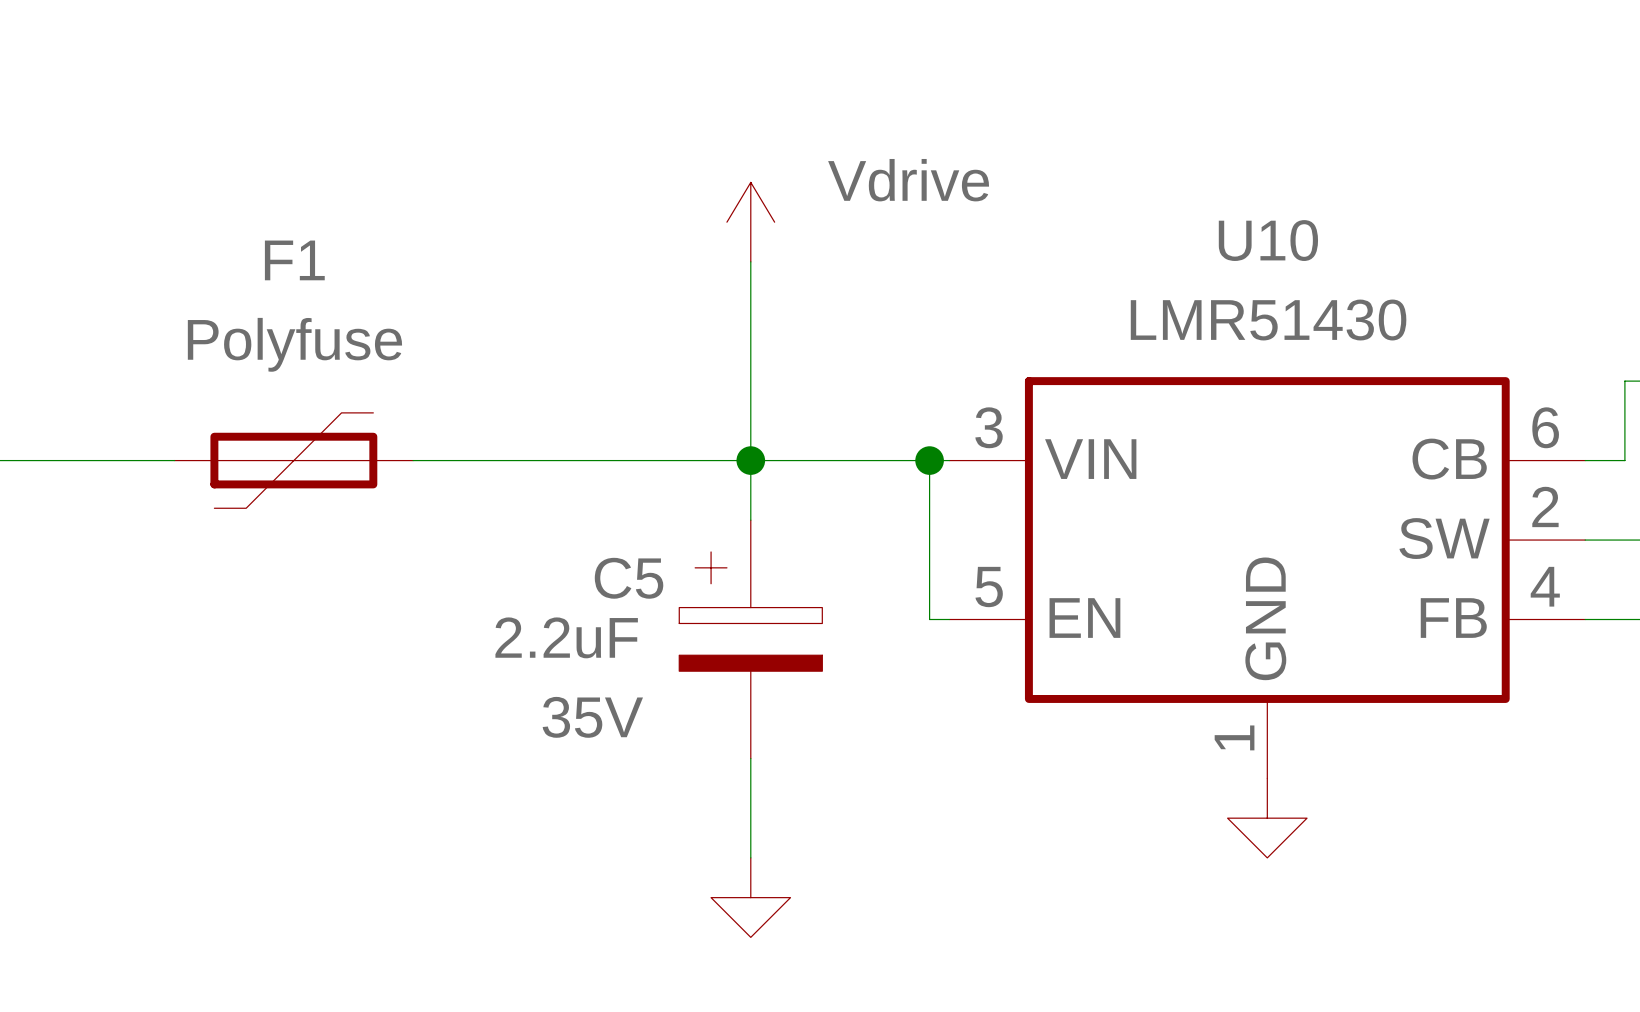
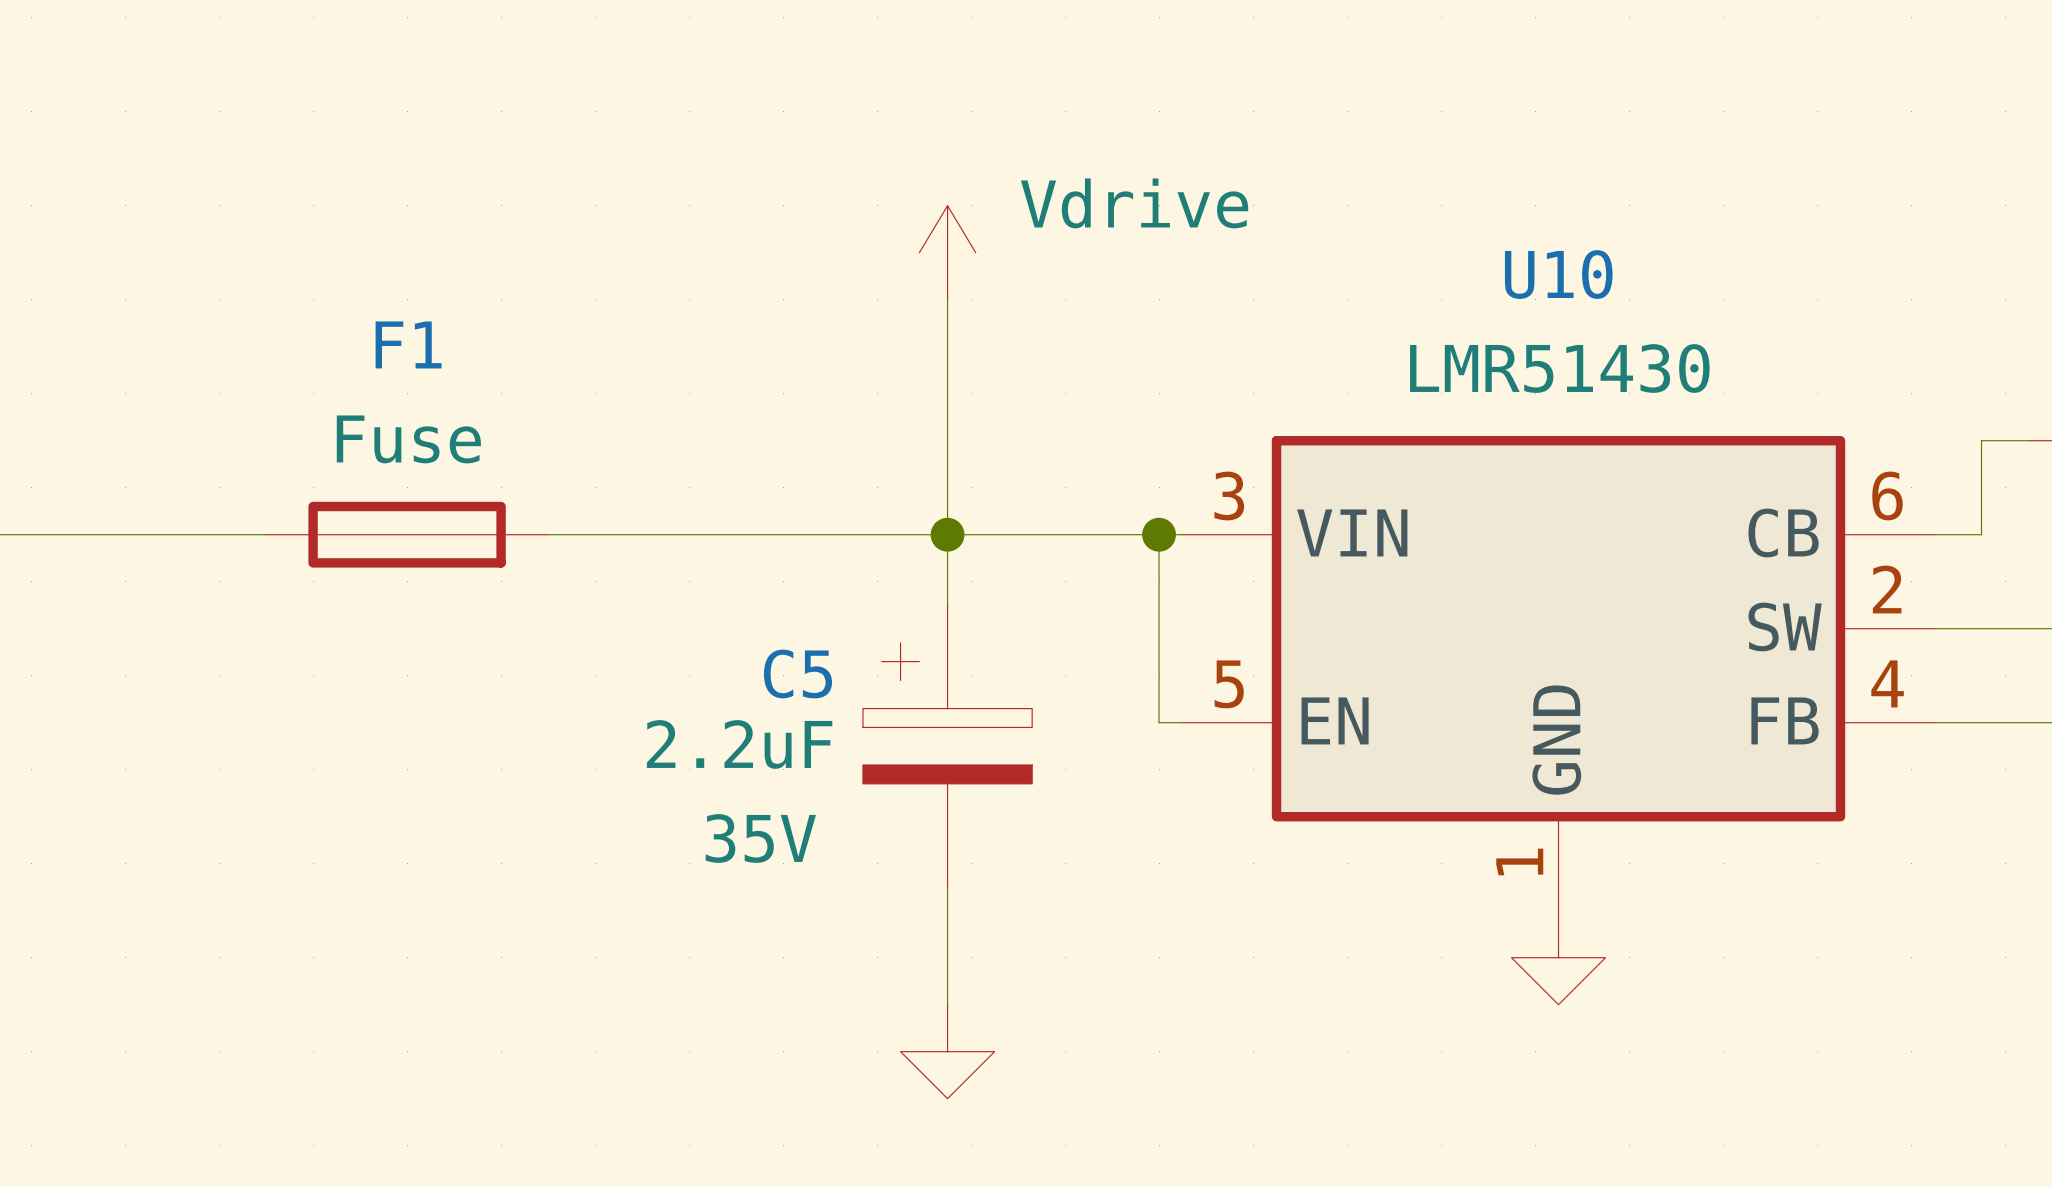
F1 name position: F1 (294, 260) -> F1 (408, 344)
F1 value: Polyfuse (294, 344) -> Fuse (408, 439)
F1 symbol: [174, 412, 414, 509] -> [266, 501, 549, 568]

